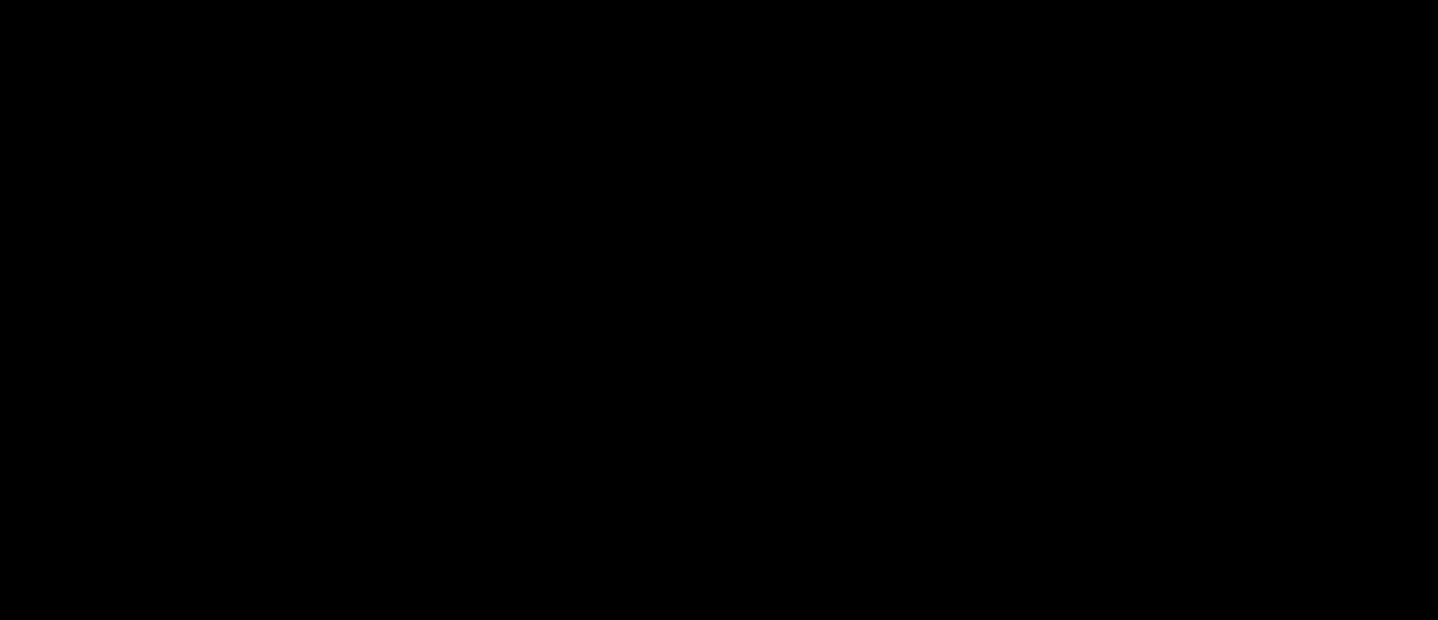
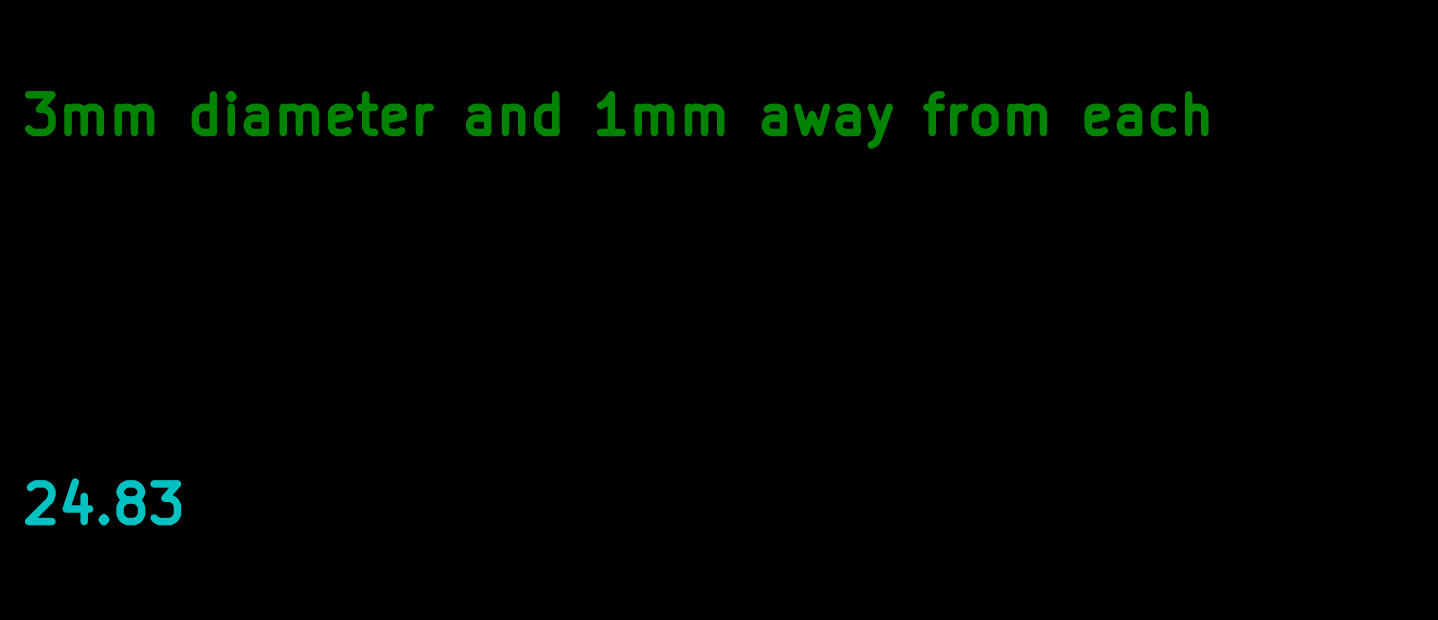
text: none -> 3mm diameter and 1mm away from each (616, 119)
text: none -> 24.83 (103, 501)

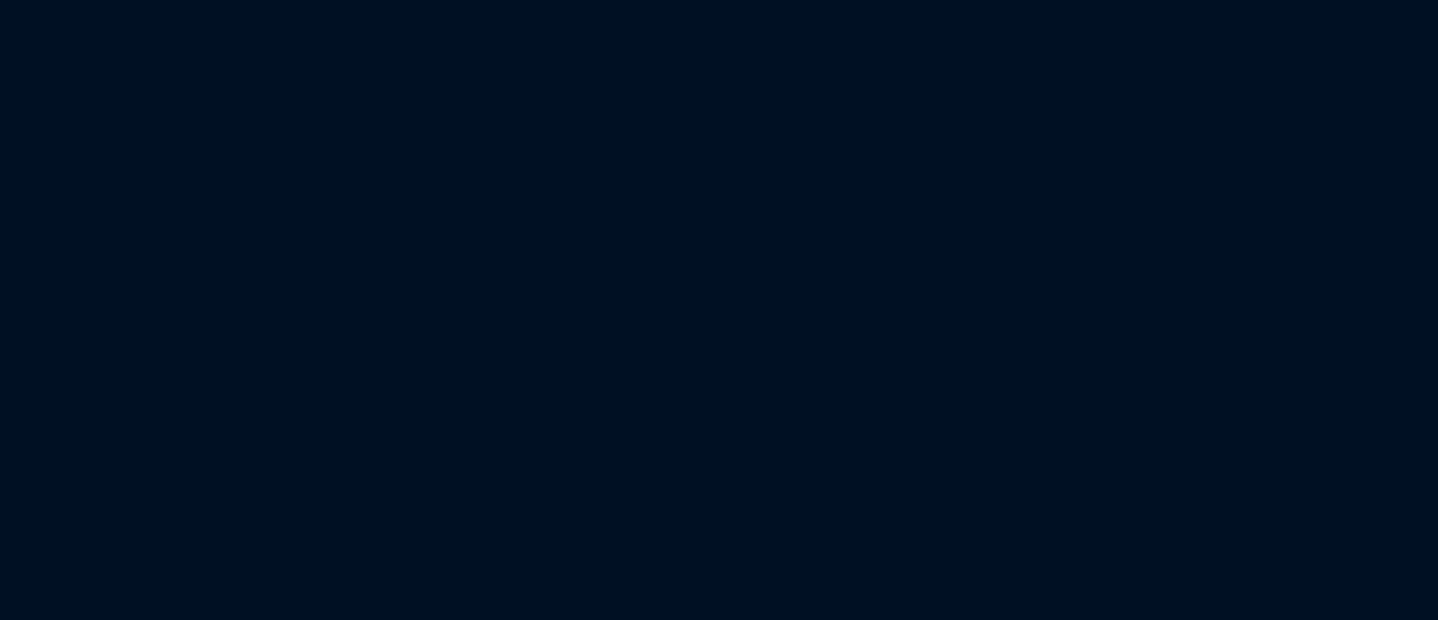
text: 3mm diameter and 1mm away from each (616, 119) -> none
text: 24.83 (103, 501) -> none

